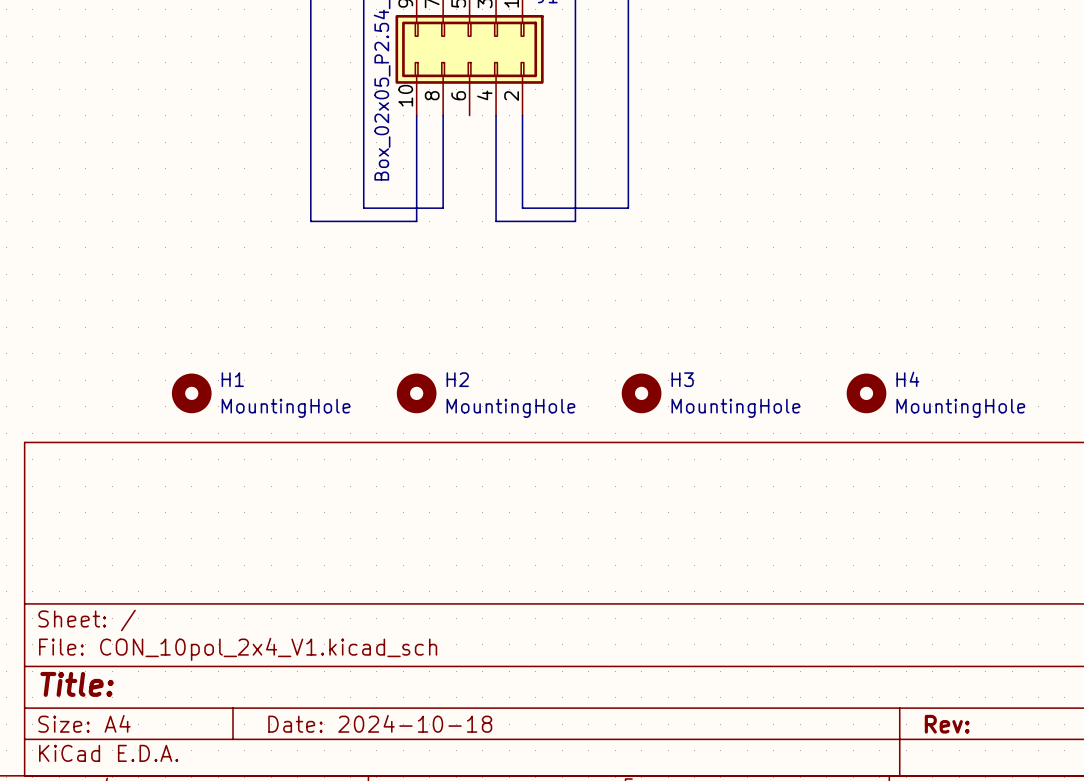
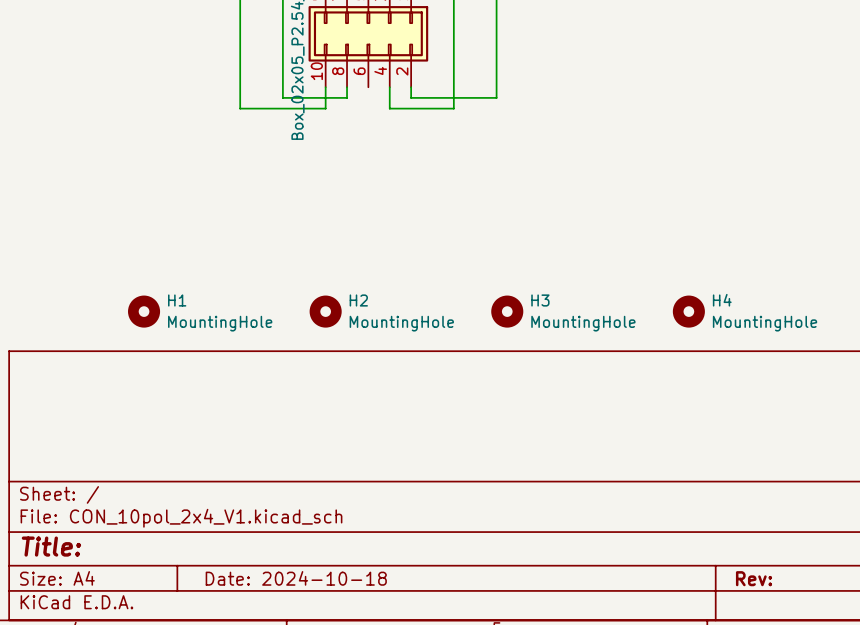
wire: (363, 128) (363, 208) (443, 208) (443, 128) -> (282, 97) (347, 97)
wire: (522, 128) (522, 208) (628, 208) (628, 128) -> (411, 97) (496, 97)
wire: (310, 142) (310, 221) (416, 221) (416, 142) -> (240, 108) (325, 108)
wire: (496, 142) (496, 221) (575, 221) (575, 142) -> (389, 108) (453, 108)

